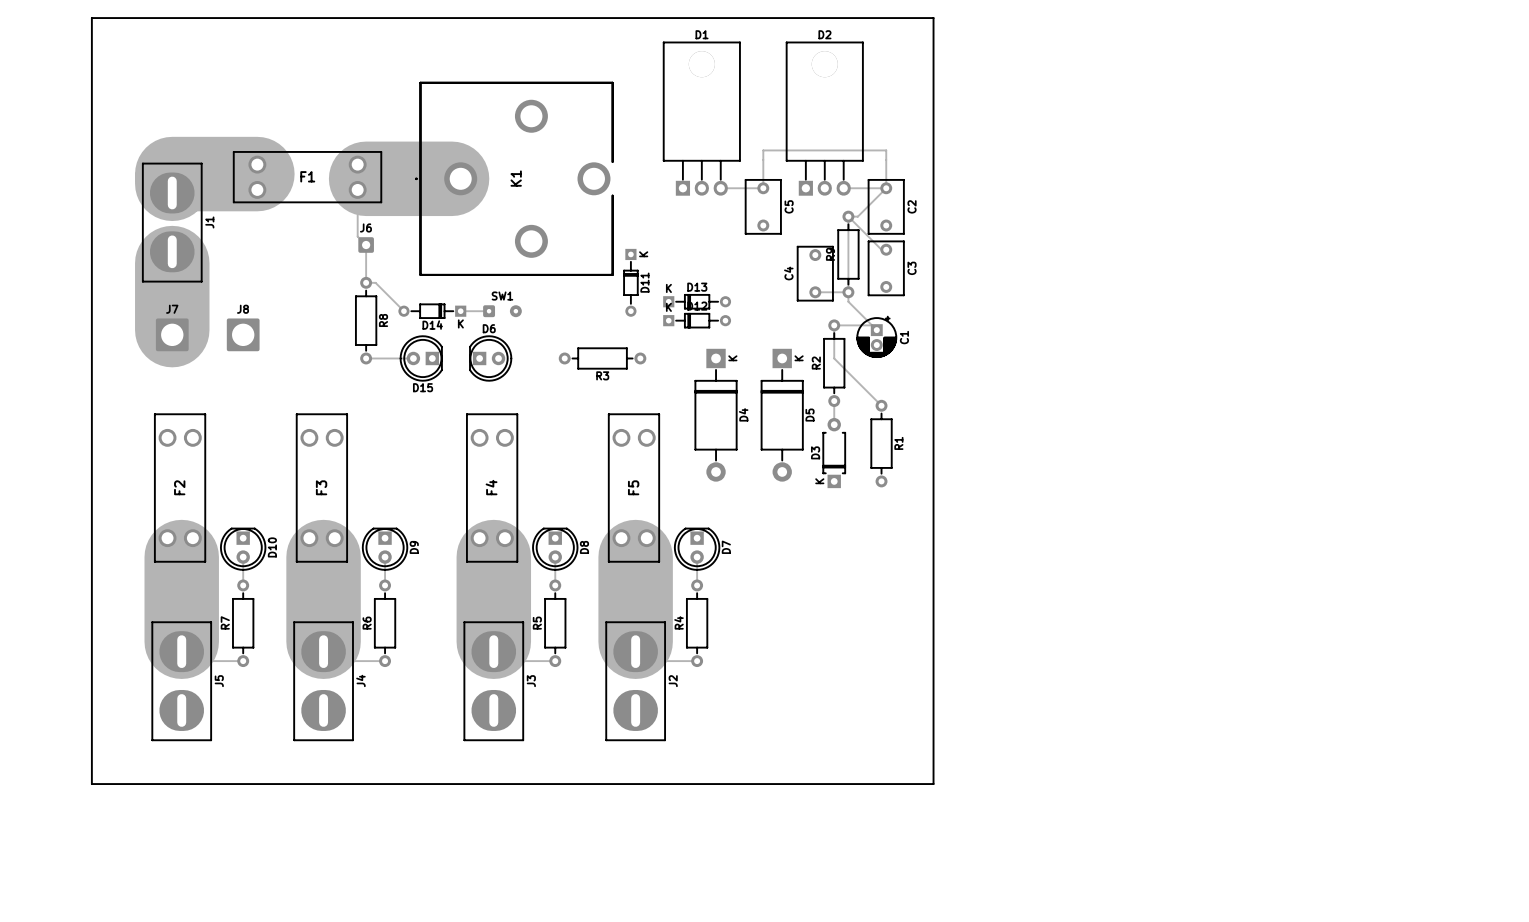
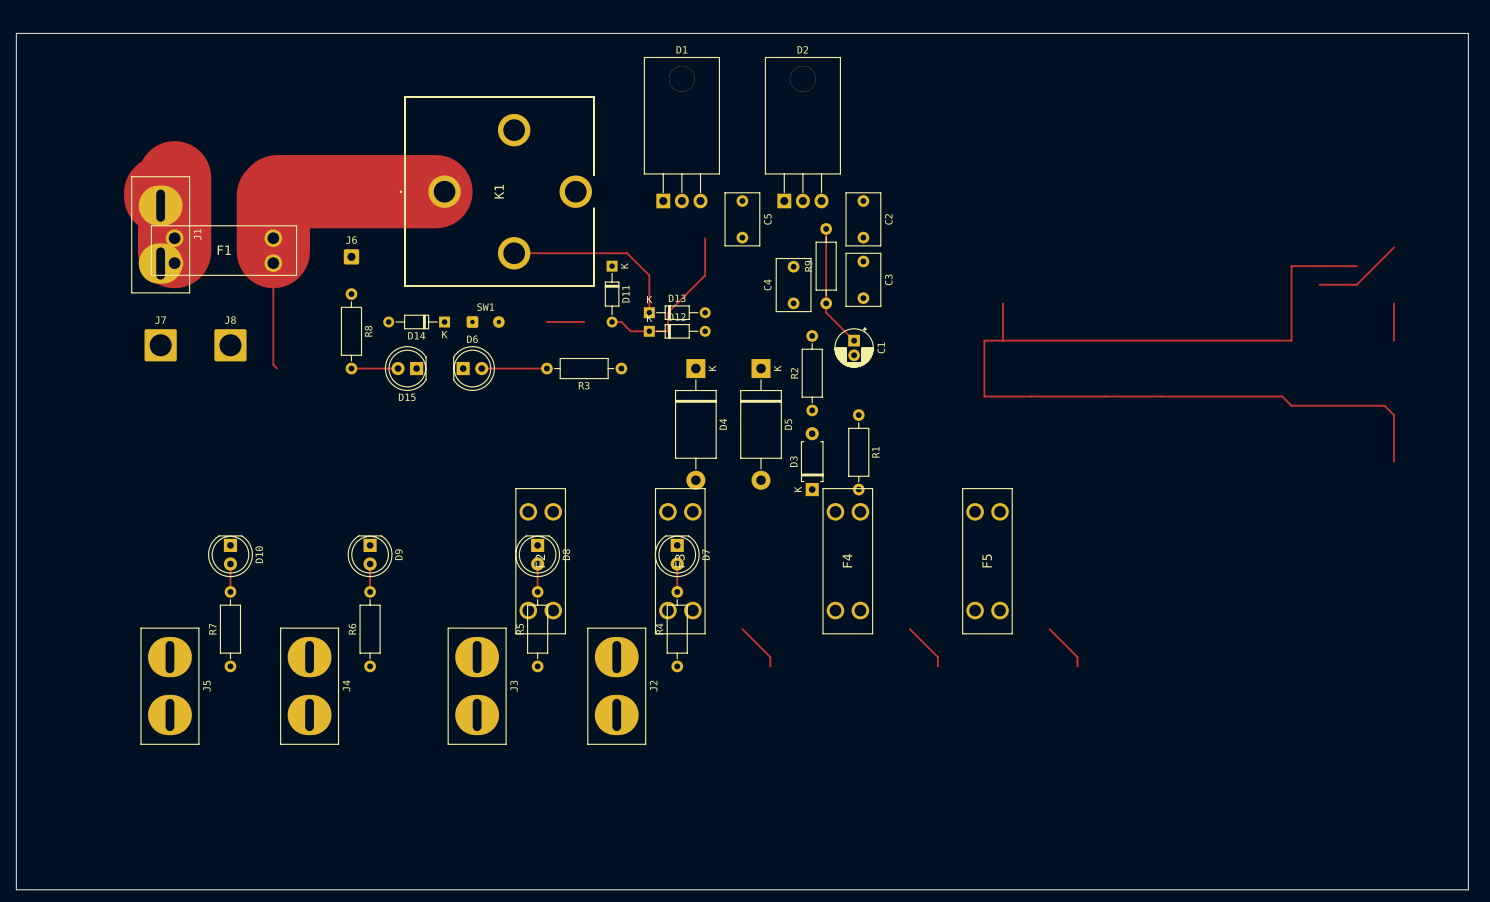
board edge: (91, 18) (91, 784) (933, 784) (933, 18) -> (81, 33) (16, 33) (16, 889) (1468, 889) (1468, 33) (909, 33)
track: none -> (174, 177) (174, 251)
track: (172, 174) (257, 174) -> none
F1 position: (307, 177) -> (223, 250)
track: none -> (351, 191) (277, 191) (273, 195) (273, 251)
track: (720, 188) (763, 188) (763, 150) (886, 150) (886, 188) -> none
track: (843, 188) (886, 188) -> none
track: (886, 188) (857, 216) (848, 216) (881, 249) (886, 249) -> none
track: (357, 189) (357, 236) (366, 245) (366, 282) (375, 282) (403, 311) -> none
track: none -> (705, 238) (705, 275) (667, 312) (667, 331) (630, 331) (621, 322) (610, 322)
track: none -> (1393, 247) (1356, 284) (1319, 284)
track: none -> (514, 253) (627, 253) (649, 275) (649, 312)
track: none -> (273, 263) (273, 364) (277, 368)
track: none -> (1356, 266) (1291, 266) (1291, 340) (984, 340) (984, 396) (1282, 396) (1291, 405) (1384, 405) (1393, 415) (1393, 461)
track: (172, 263) (172, 330) -> none
track: (815, 292) (848, 292) -> none
track: none -> (1003, 303) (1003, 340)
track: none -> (1393, 303) (1393, 340)
track: (460, 311) (489, 311) -> none
track: none -> (546, 322) (584, 322)
track: (872, 325) (834, 325) (834, 358) (881, 405) -> none
track: none -> (481, 368) (546, 368)
track: (834, 401) (834, 424) -> none
F2 position: (180, 488) -> (540, 561)
F3 position: (321, 488) -> (680, 561)
F4 position: (492, 488) -> (847, 561)
F5 position: (633, 488) -> (987, 561)
track: (181, 557) (181, 641) -> none
track: (323, 557) (323, 641) -> none
track: (493, 557) (493, 641) -> none
track: (635, 557) (635, 641) -> none
track: none -> (742, 629) (770, 657) (770, 666)
track: none -> (909, 629) (937, 657) (937, 666)
track: none -> (1049, 629) (1077, 657) (1077, 666)
track: (181, 651) (191, 661) (243, 661) -> none
track: (318, 651) (328, 661) (385, 661) -> none
track: (489, 651) (498, 661) (555, 661) -> none
track: (630, 651) (640, 661) (697, 661) -> none

